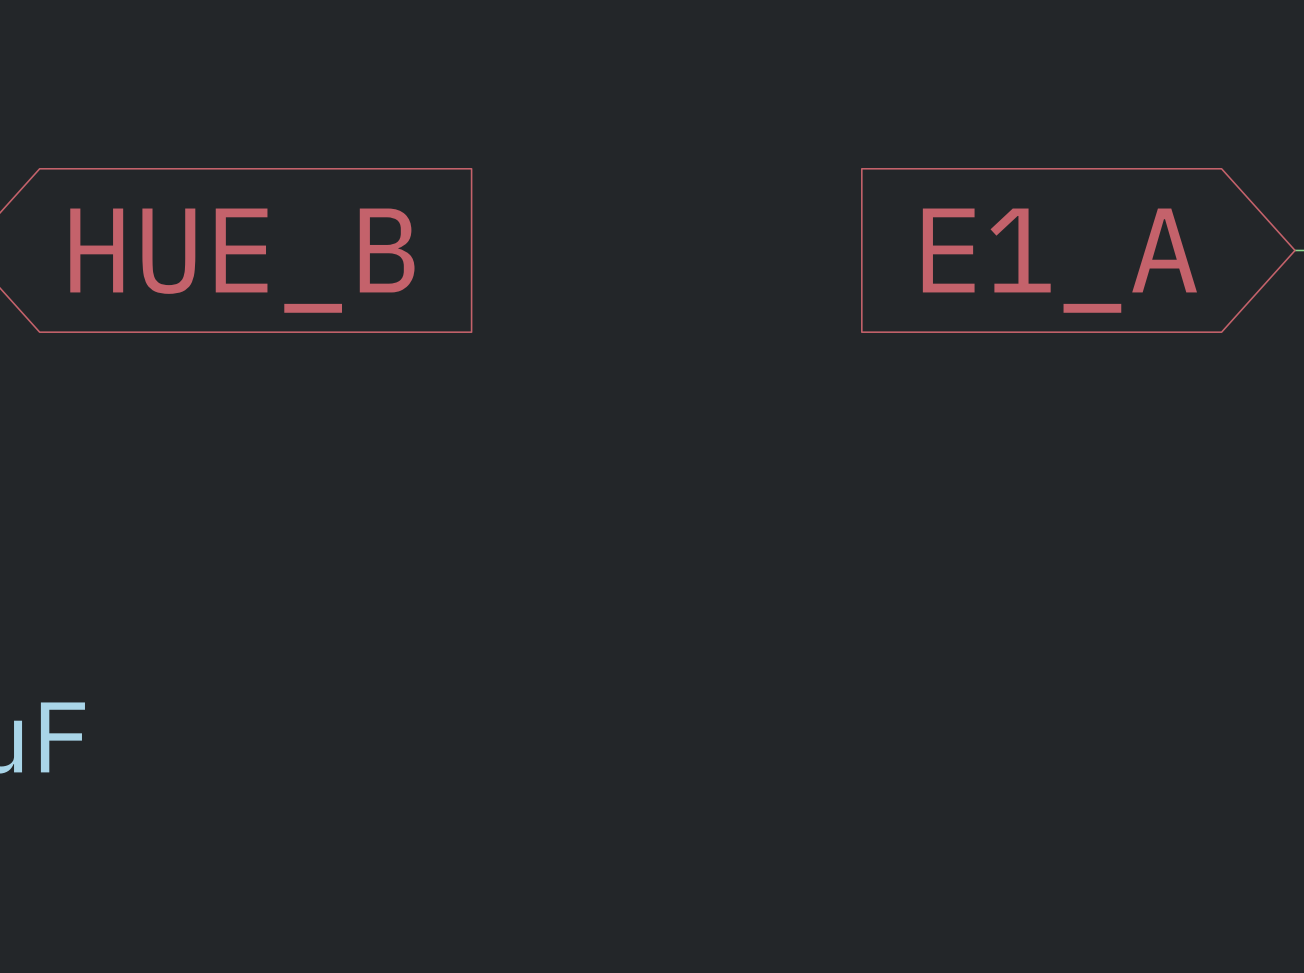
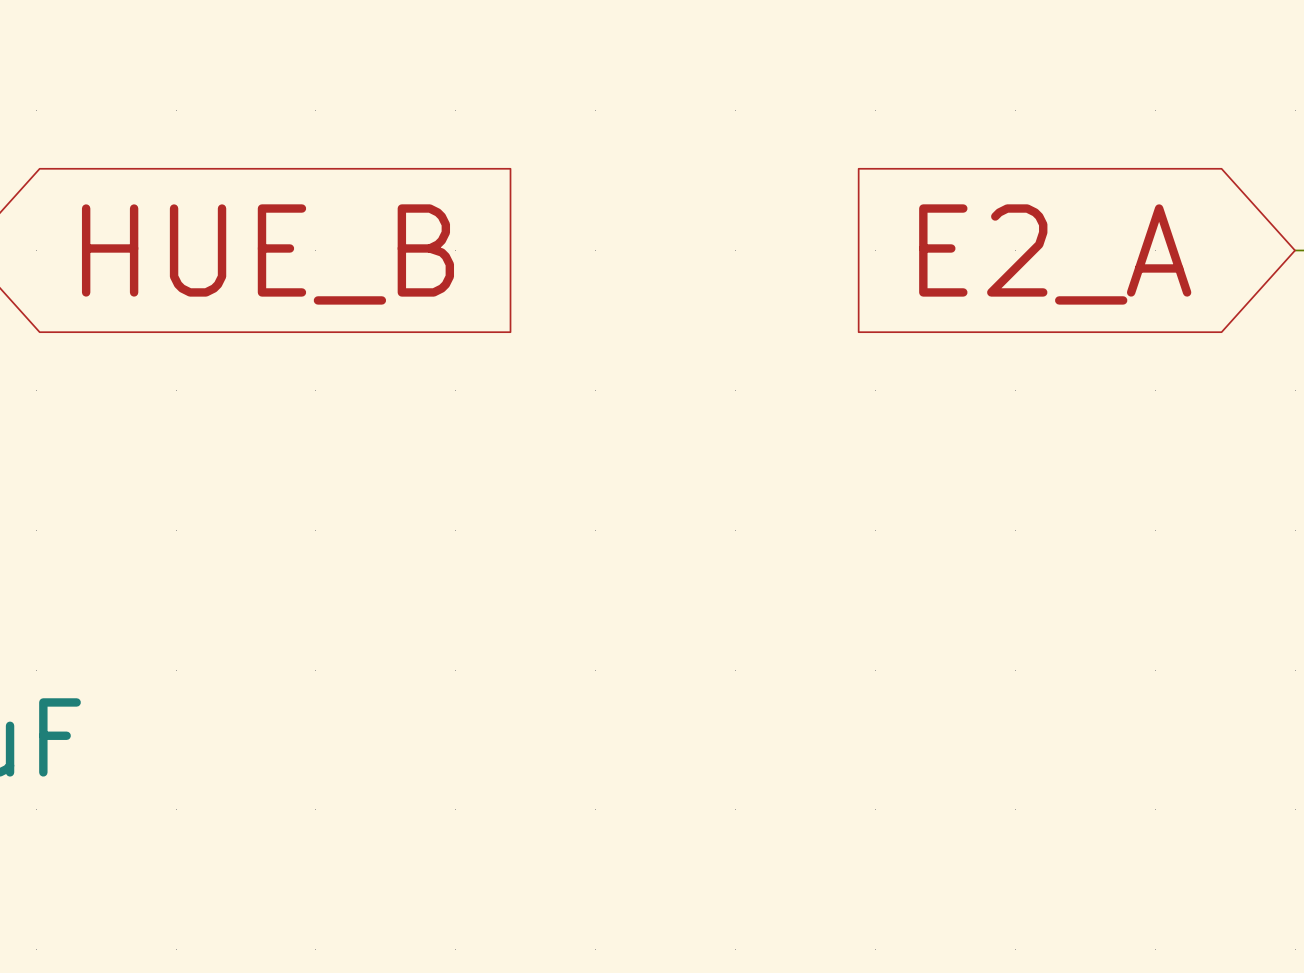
global label: E1_A (1059, 260) -> E2_A (1055, 254)

